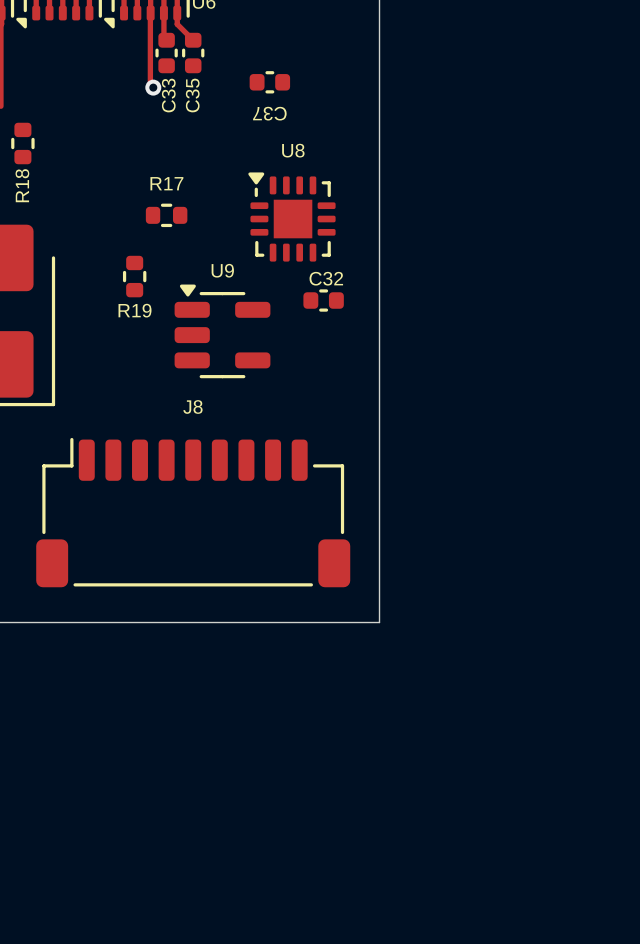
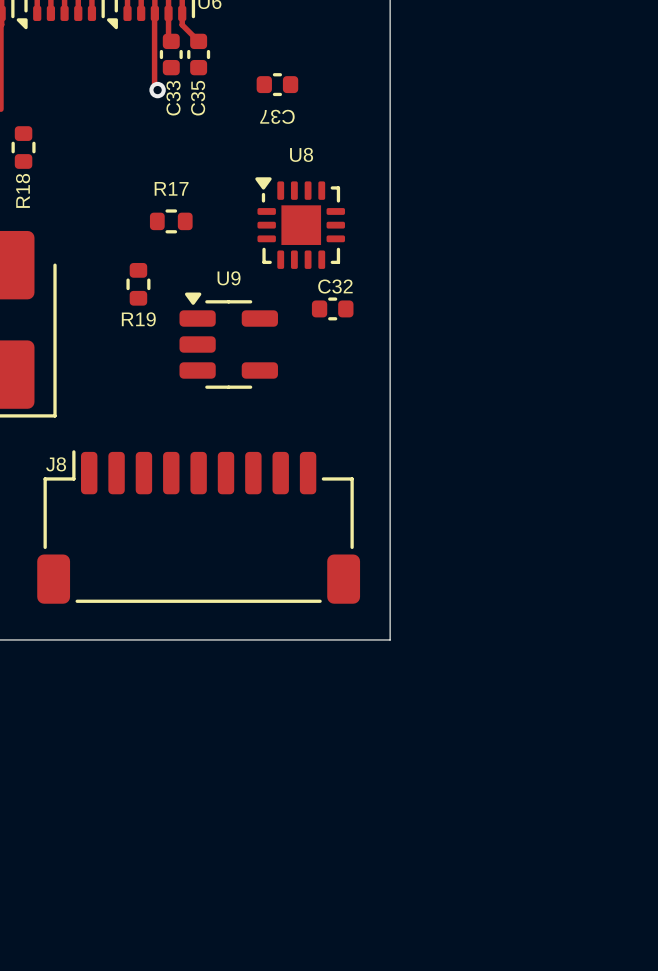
J8 name position: J8 (192, 406) -> J8 (56, 464)

